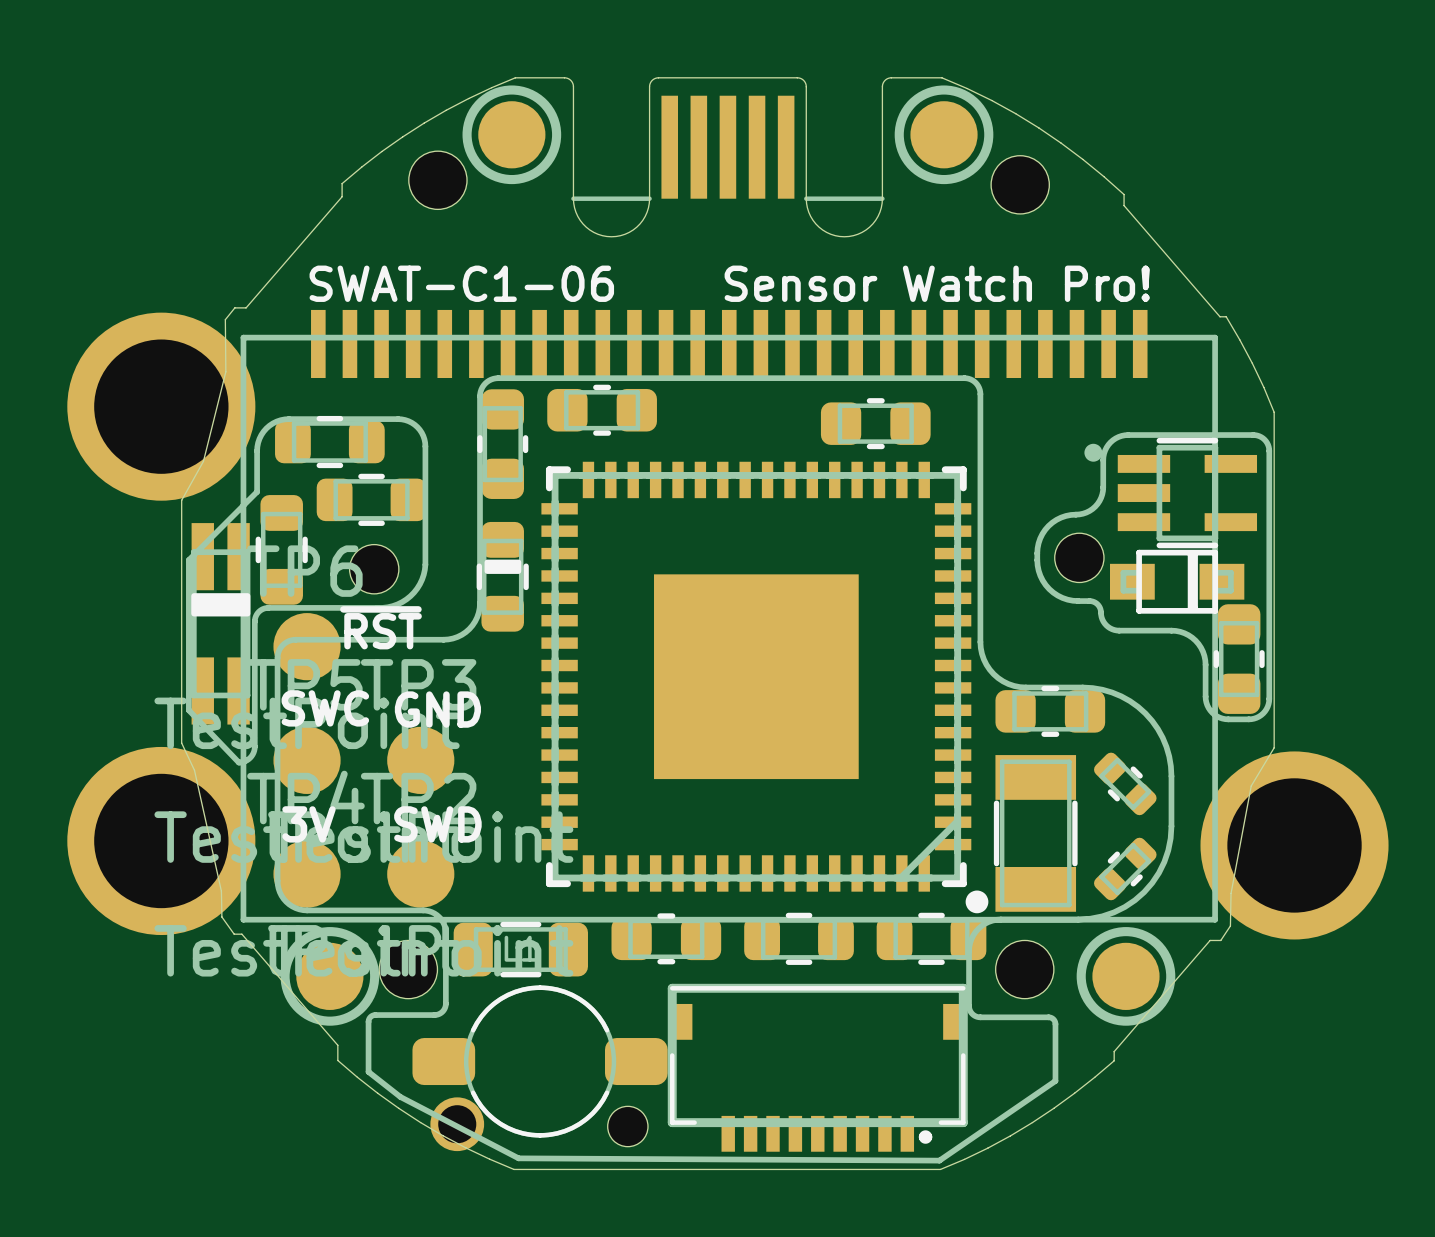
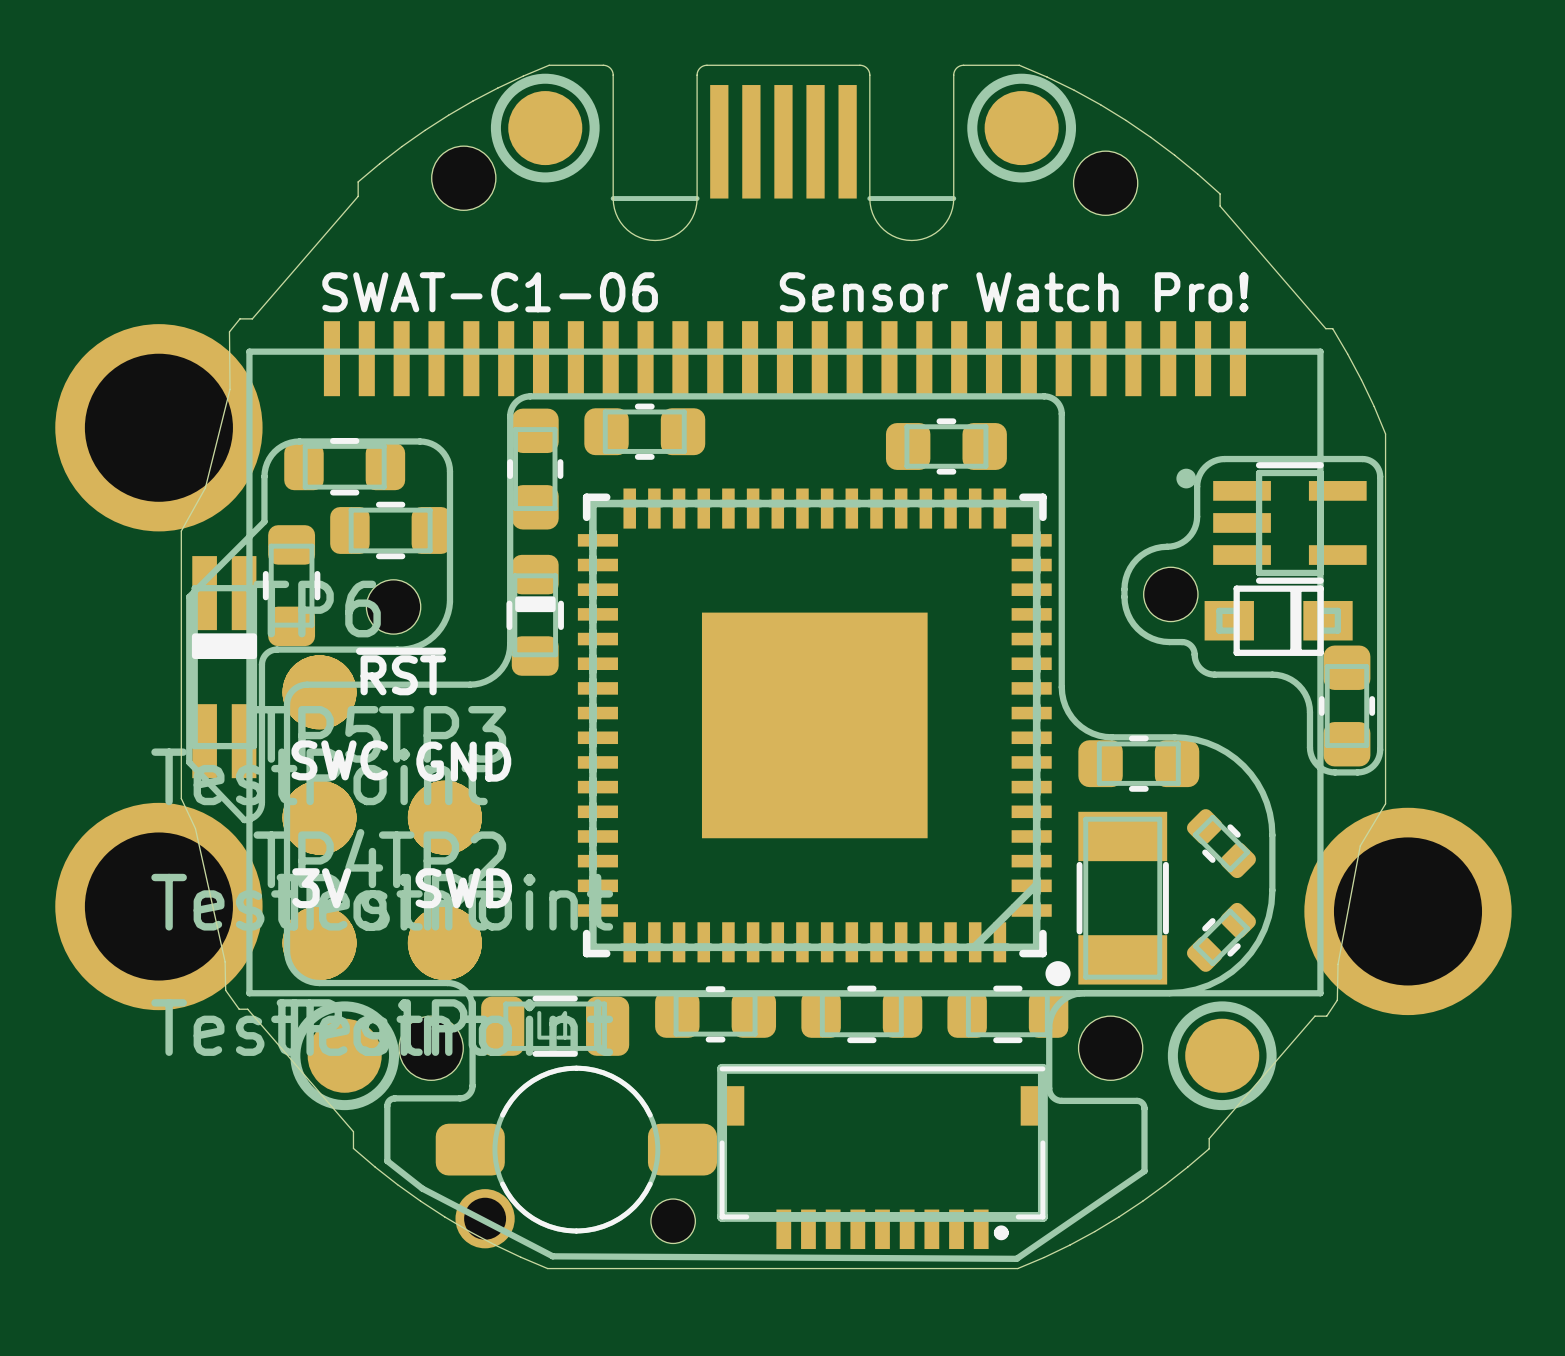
part: none -> (382, 817)

